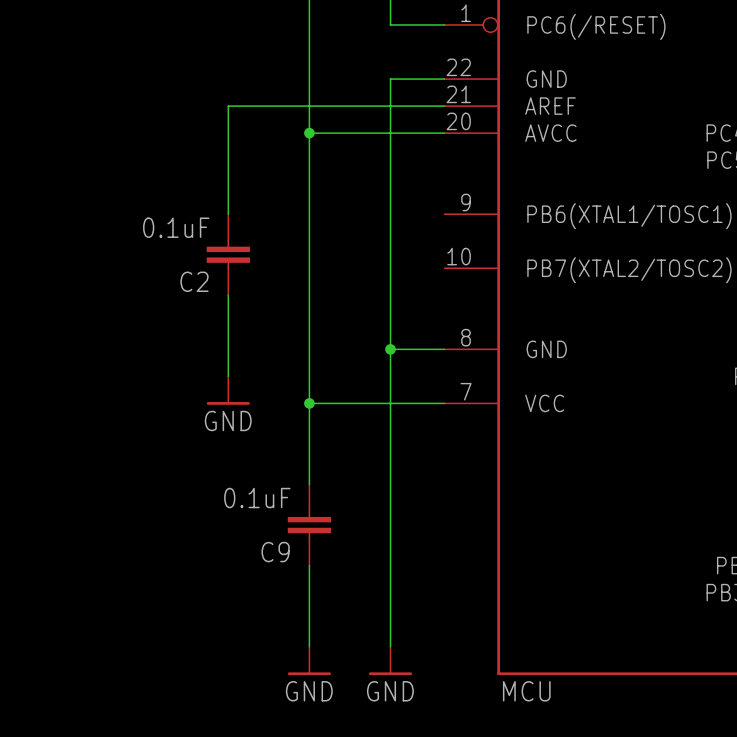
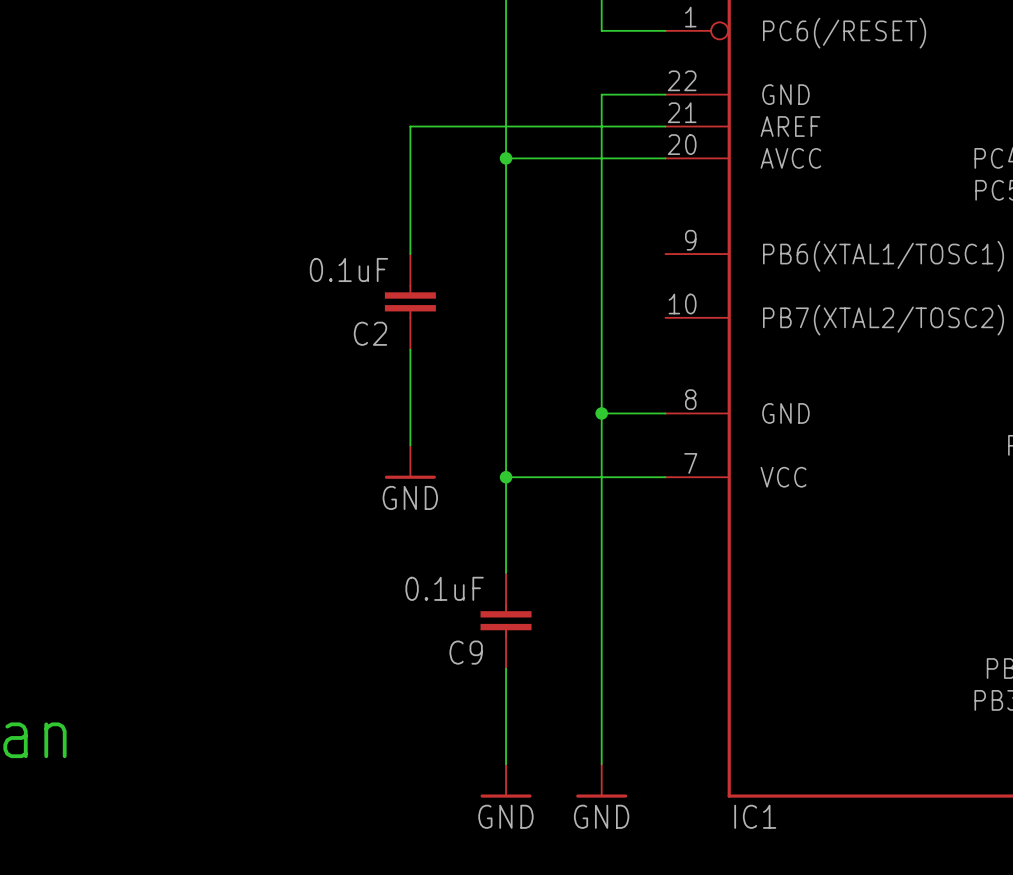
MCU name: MCU (526, 691) -> IC1 (755, 816)

